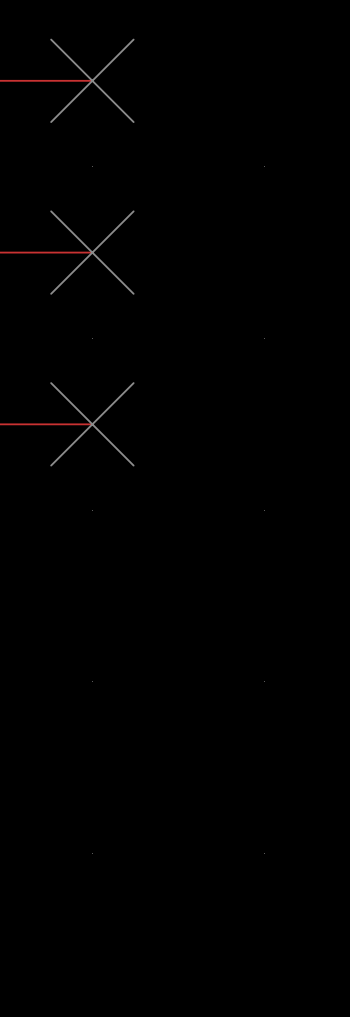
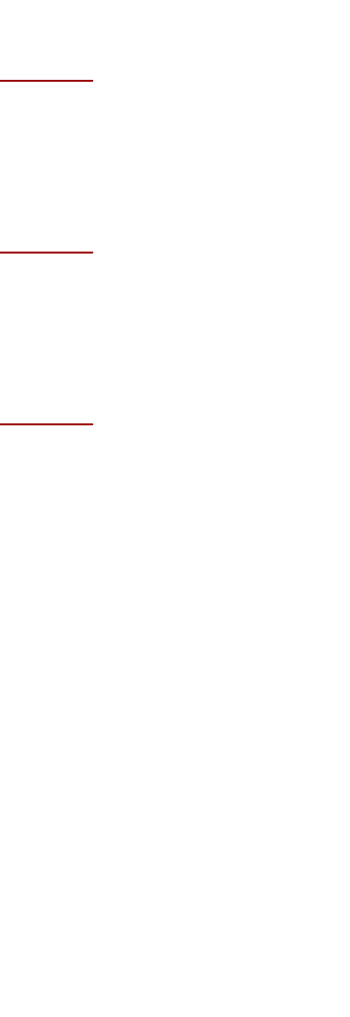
no-connect mark: (92, 80) -> none
no-connect mark: (92, 252) -> none
no-connect mark: (92, 424) -> none

